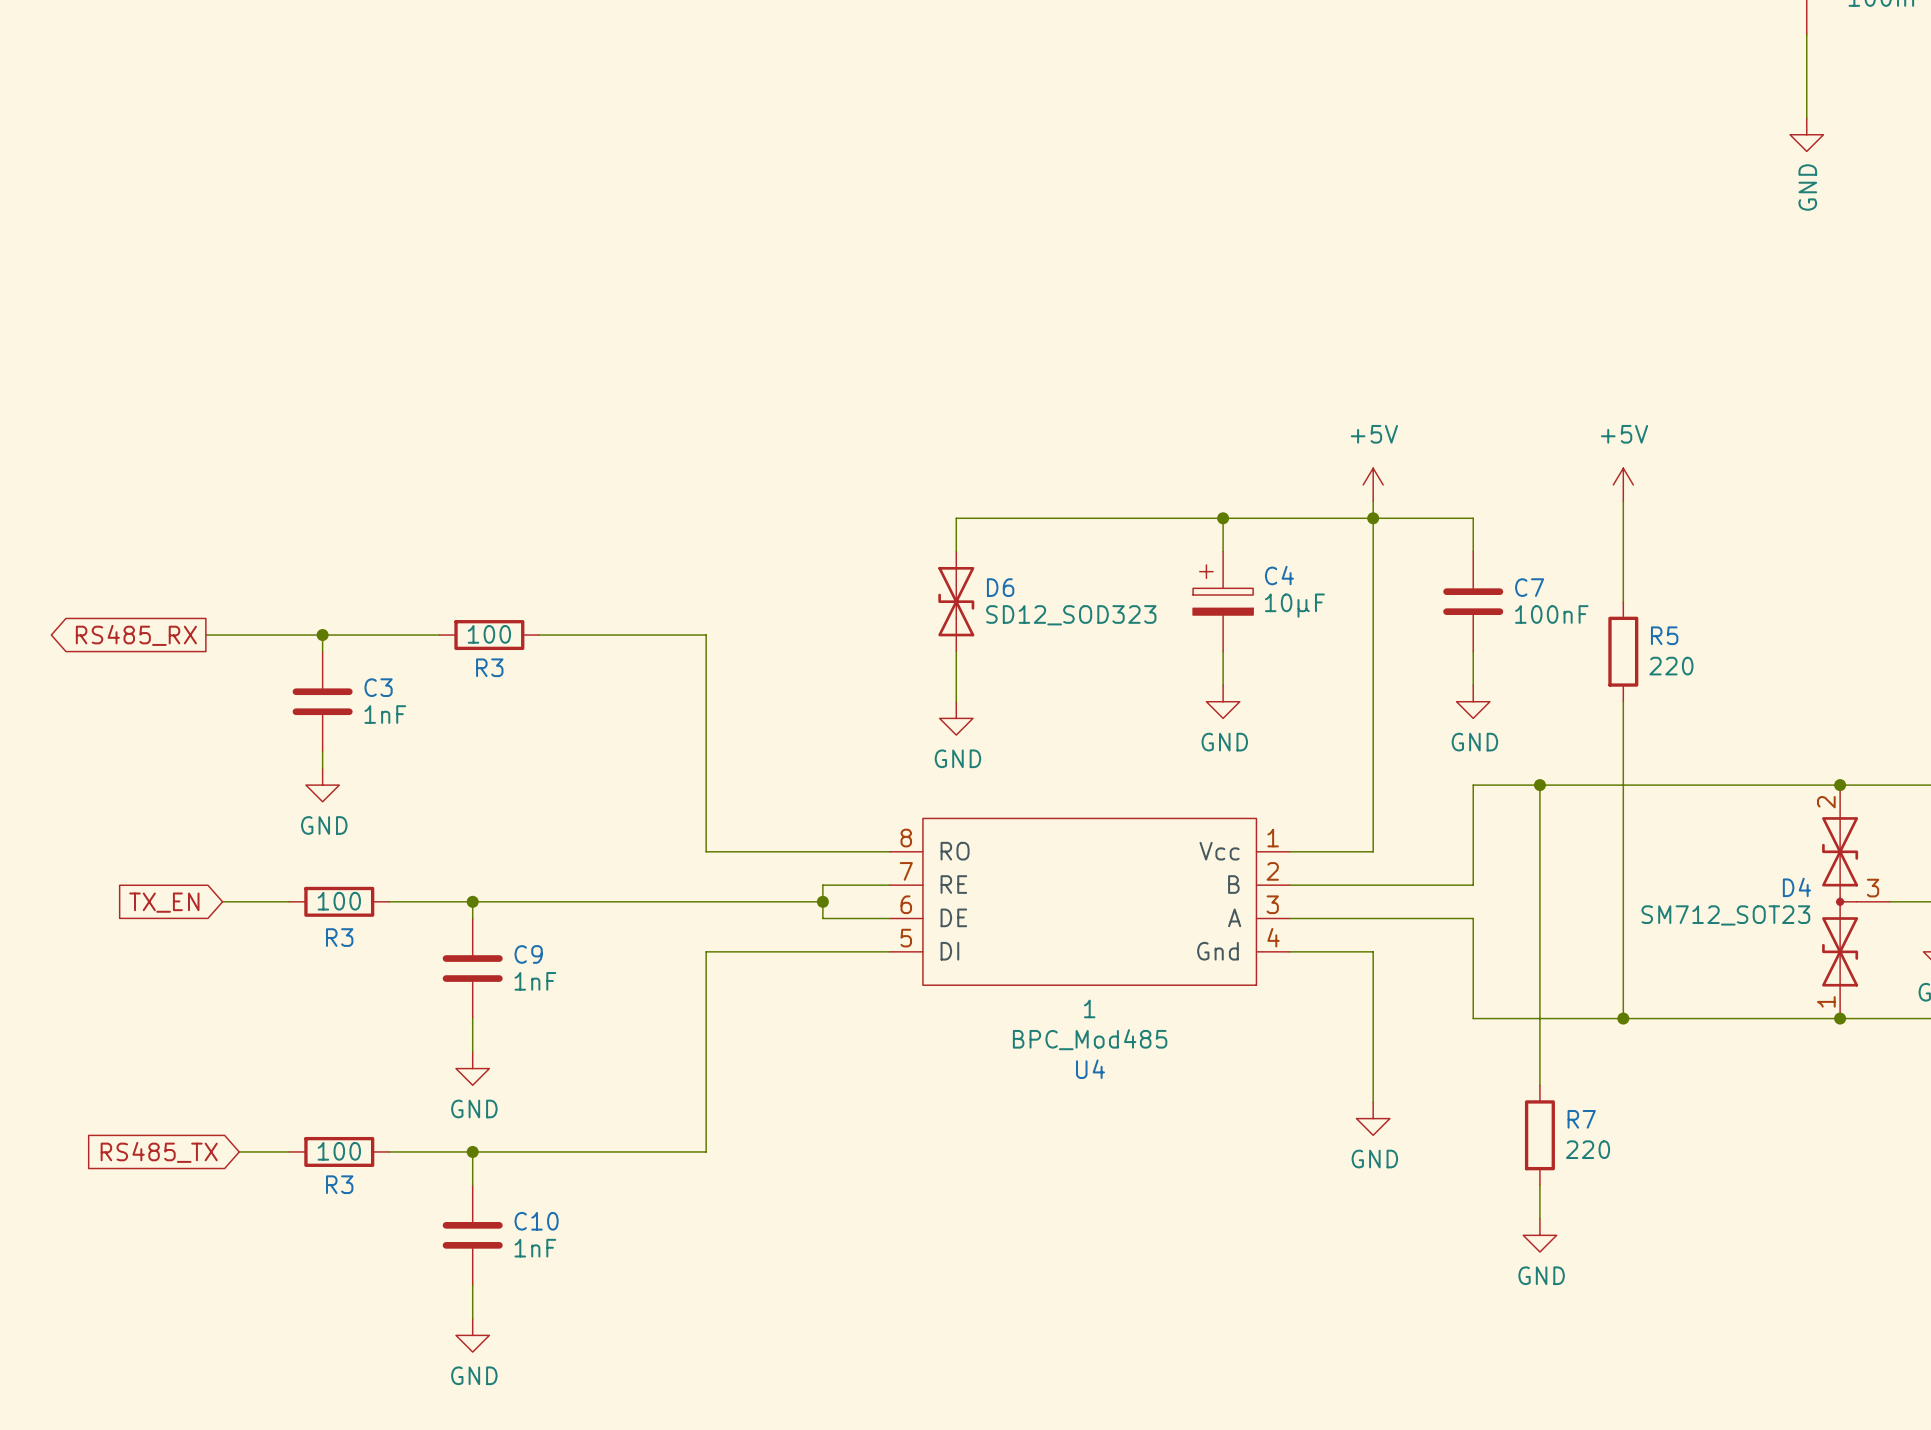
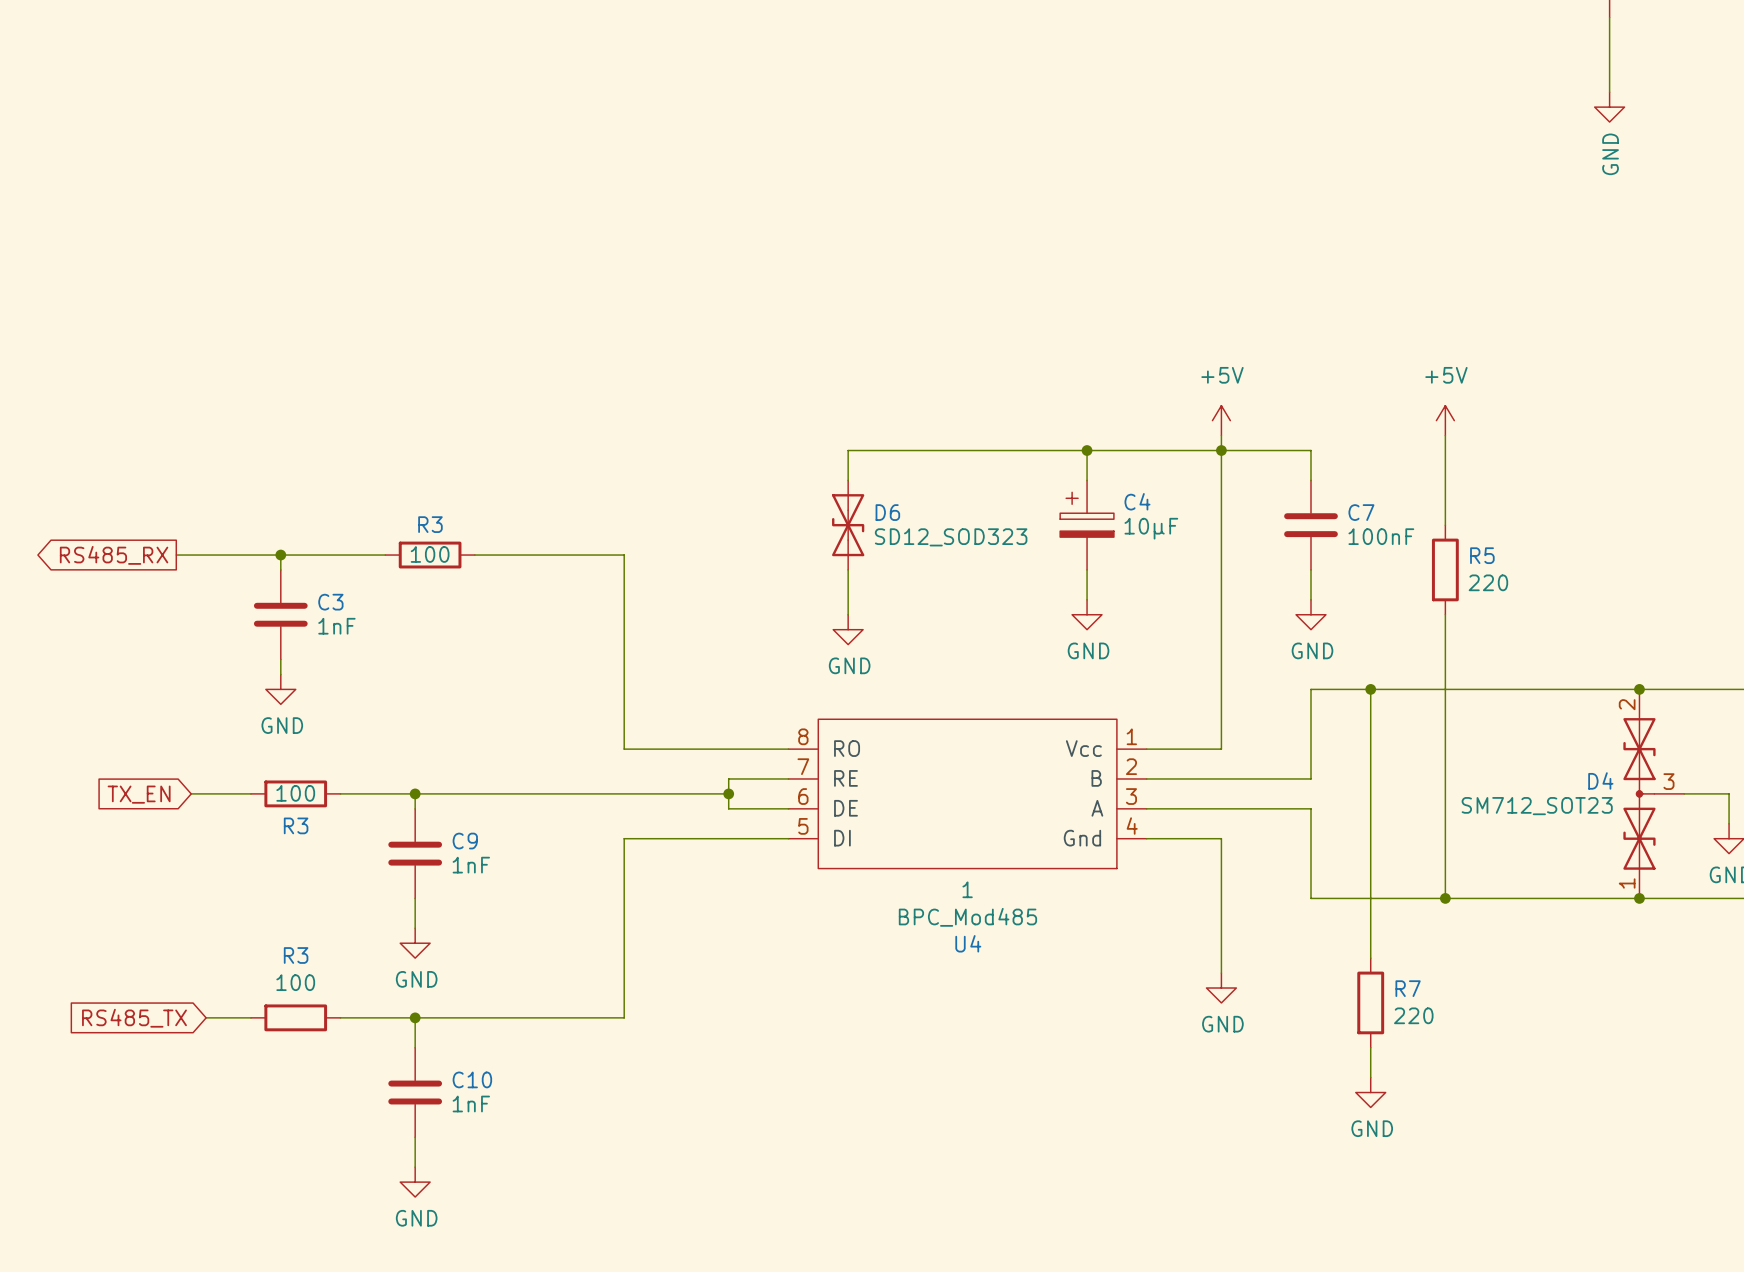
R3 name position: R3 (489, 667) -> R3 (430, 524)
R3 value position: 100 (339, 1151) -> 100 (295, 982)
R3 name position: R3 (339, 1184) -> R3 (296, 955)

